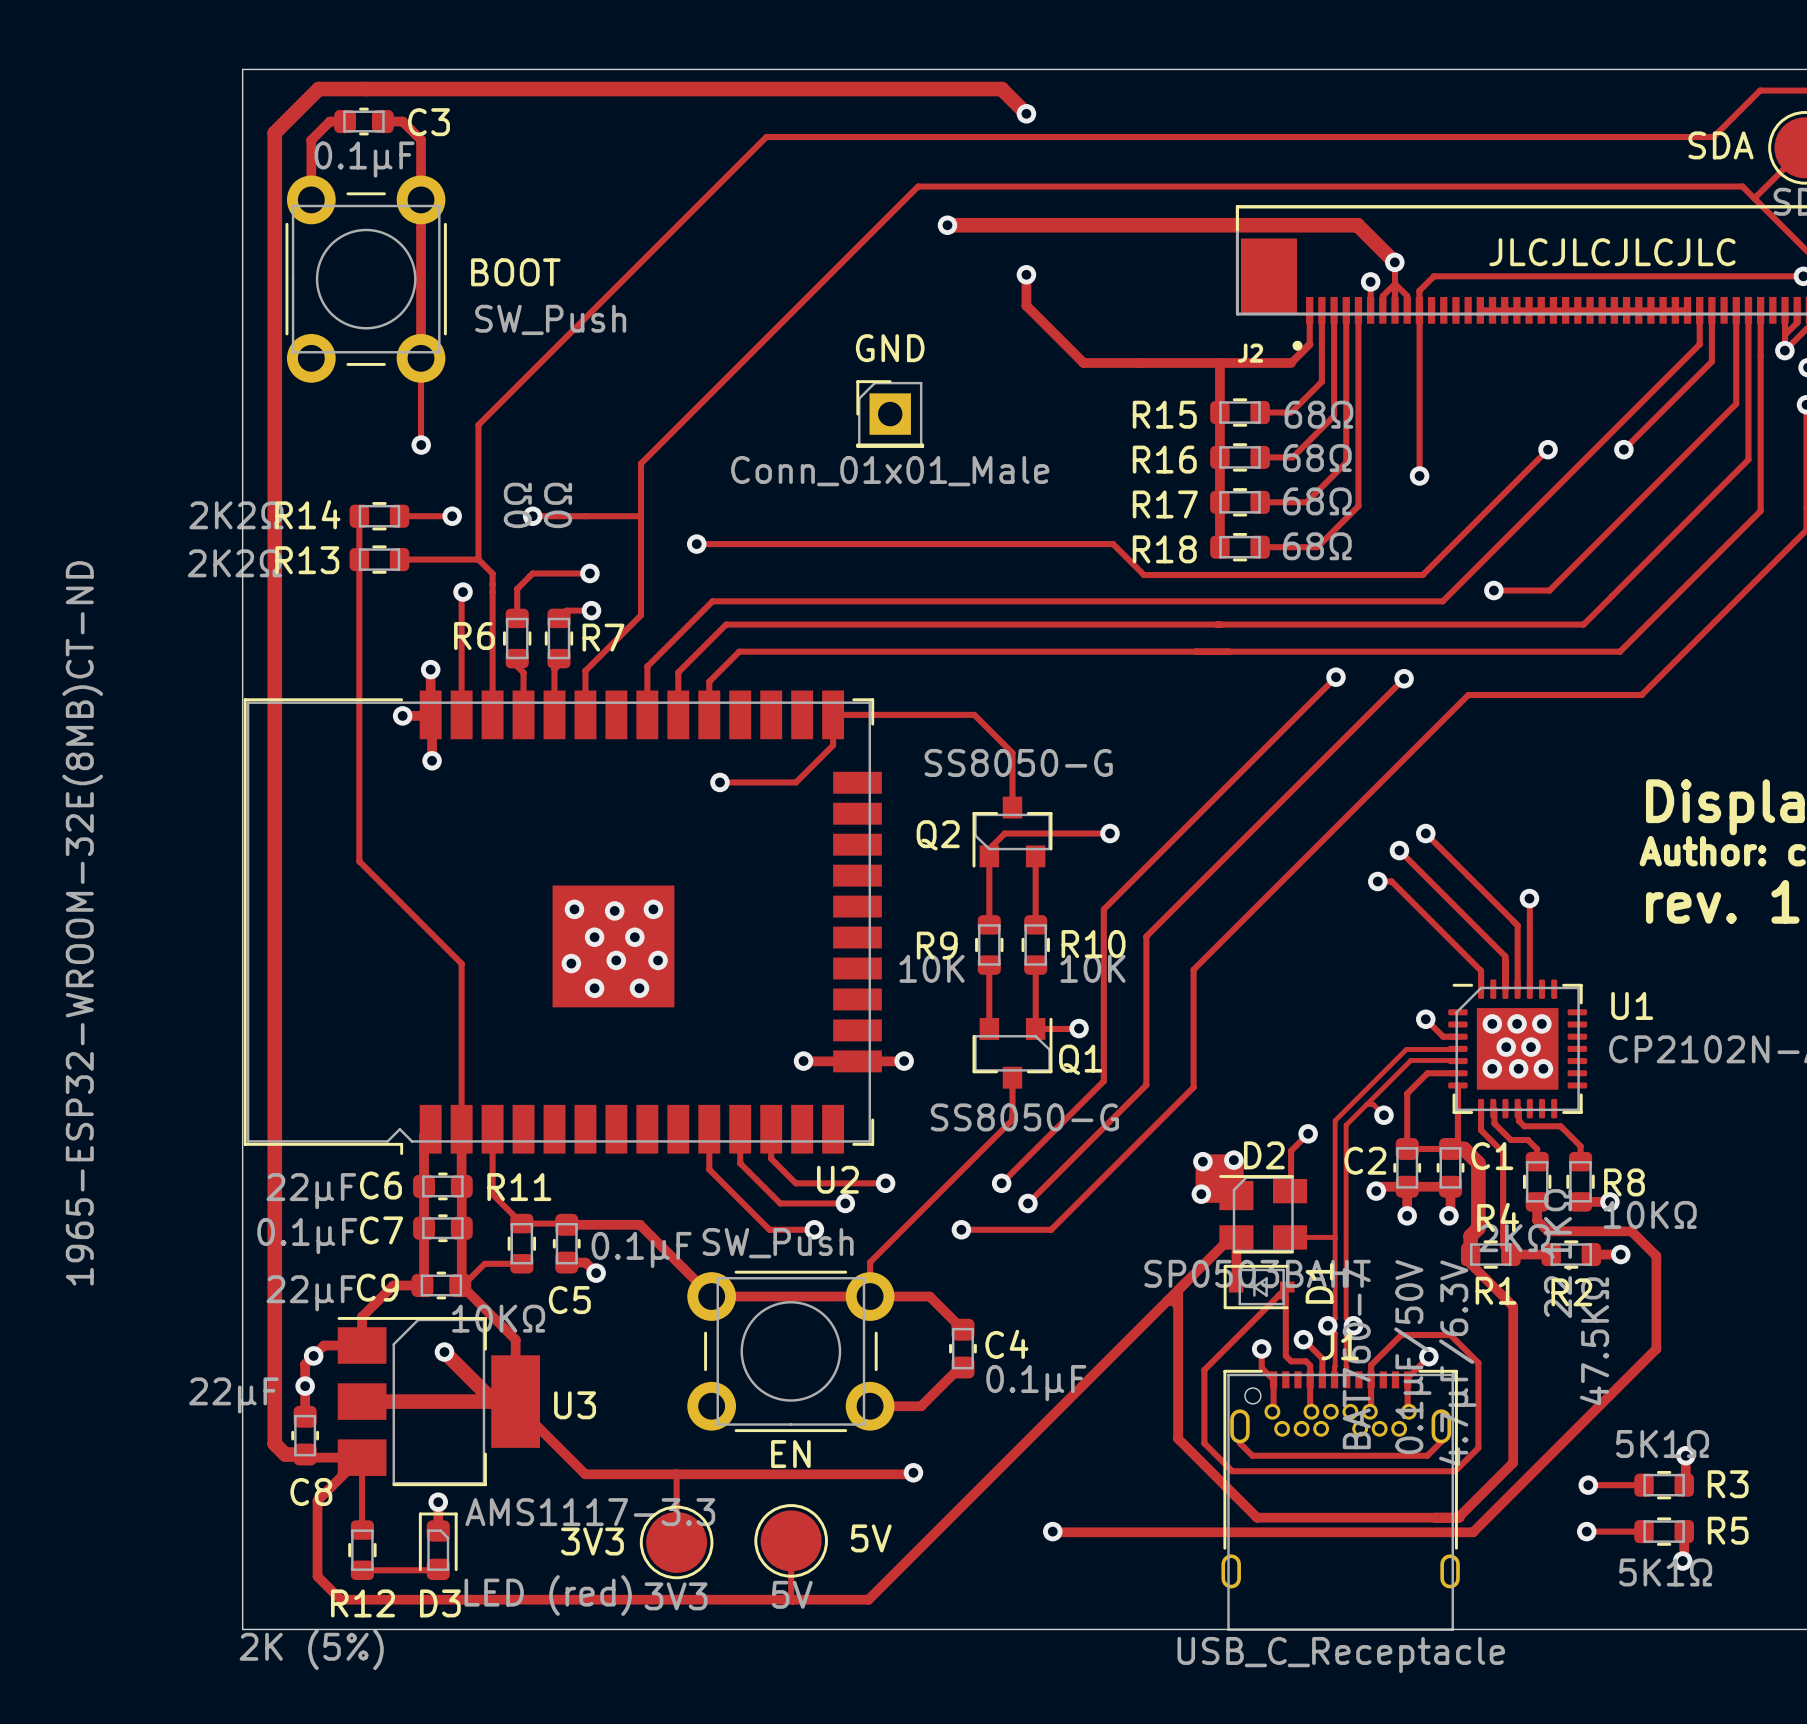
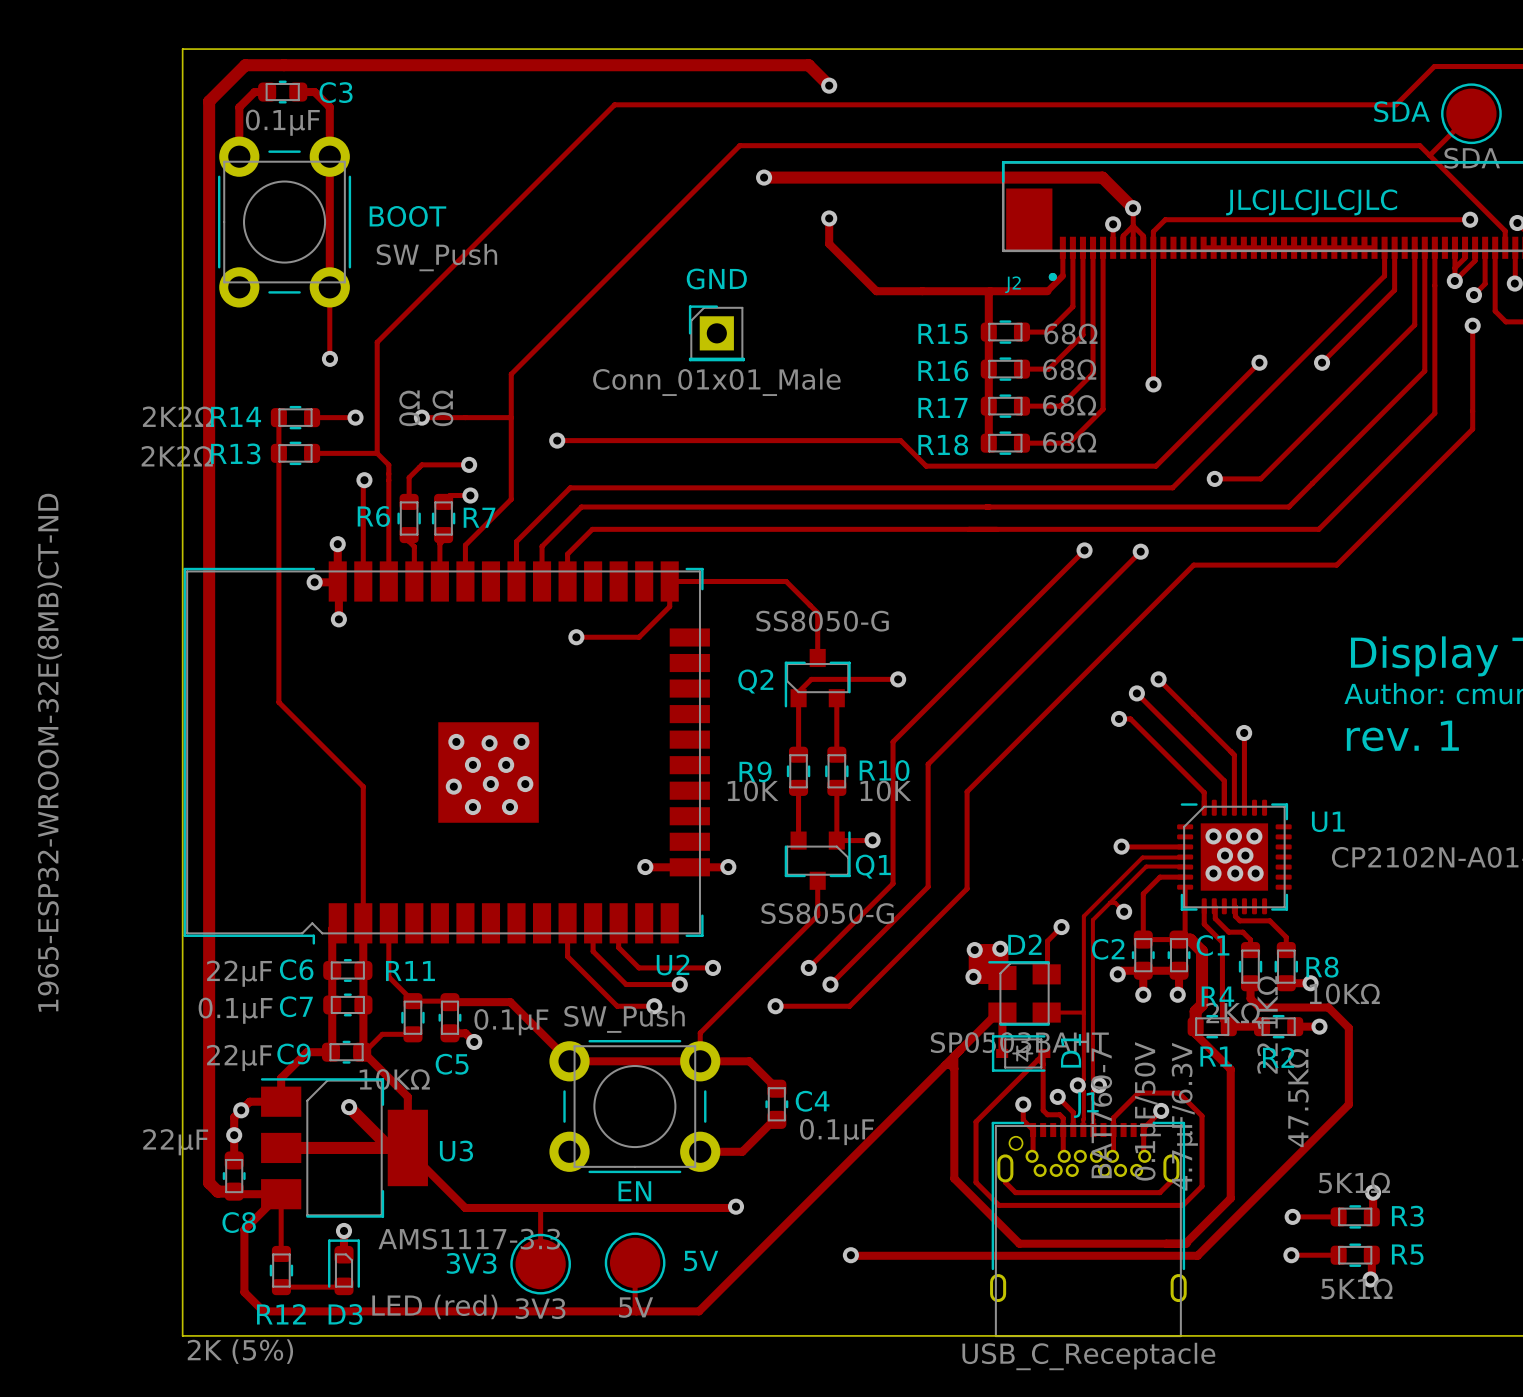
track: (1425, 1019) (1443, 1036) -> (1121, 846) (1172, 846)
via position: (1425, 1019) -> (1121, 846)

